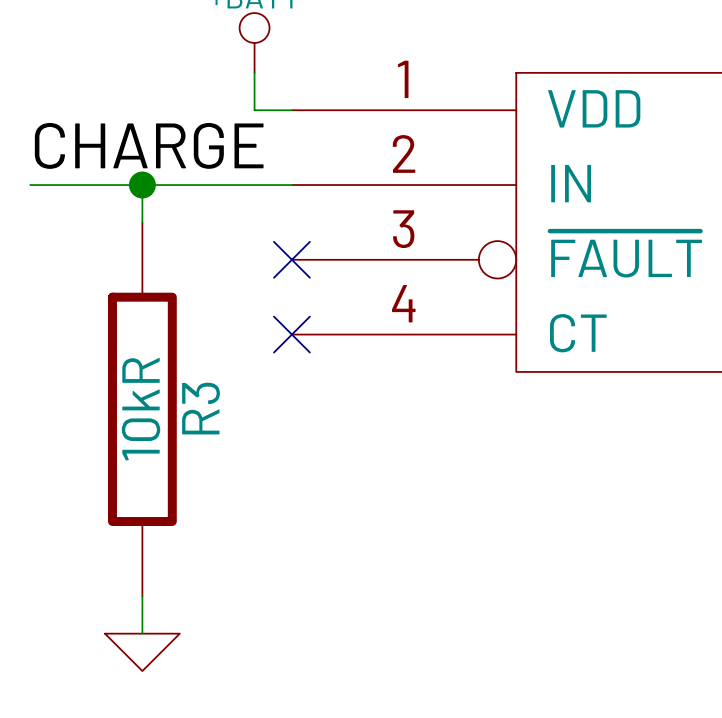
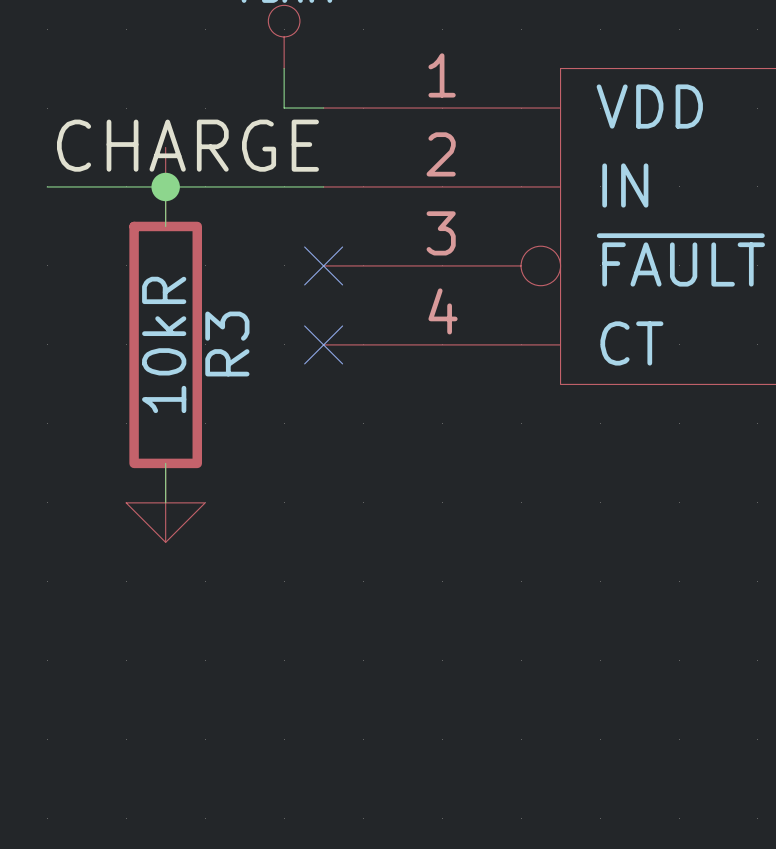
R3 position: (142, 409) -> (165, 344)
wire: (142, 596) (142, 633) -> (165, 463) (165, 502)
power symbol position: (142, 652) -> (165, 522)

